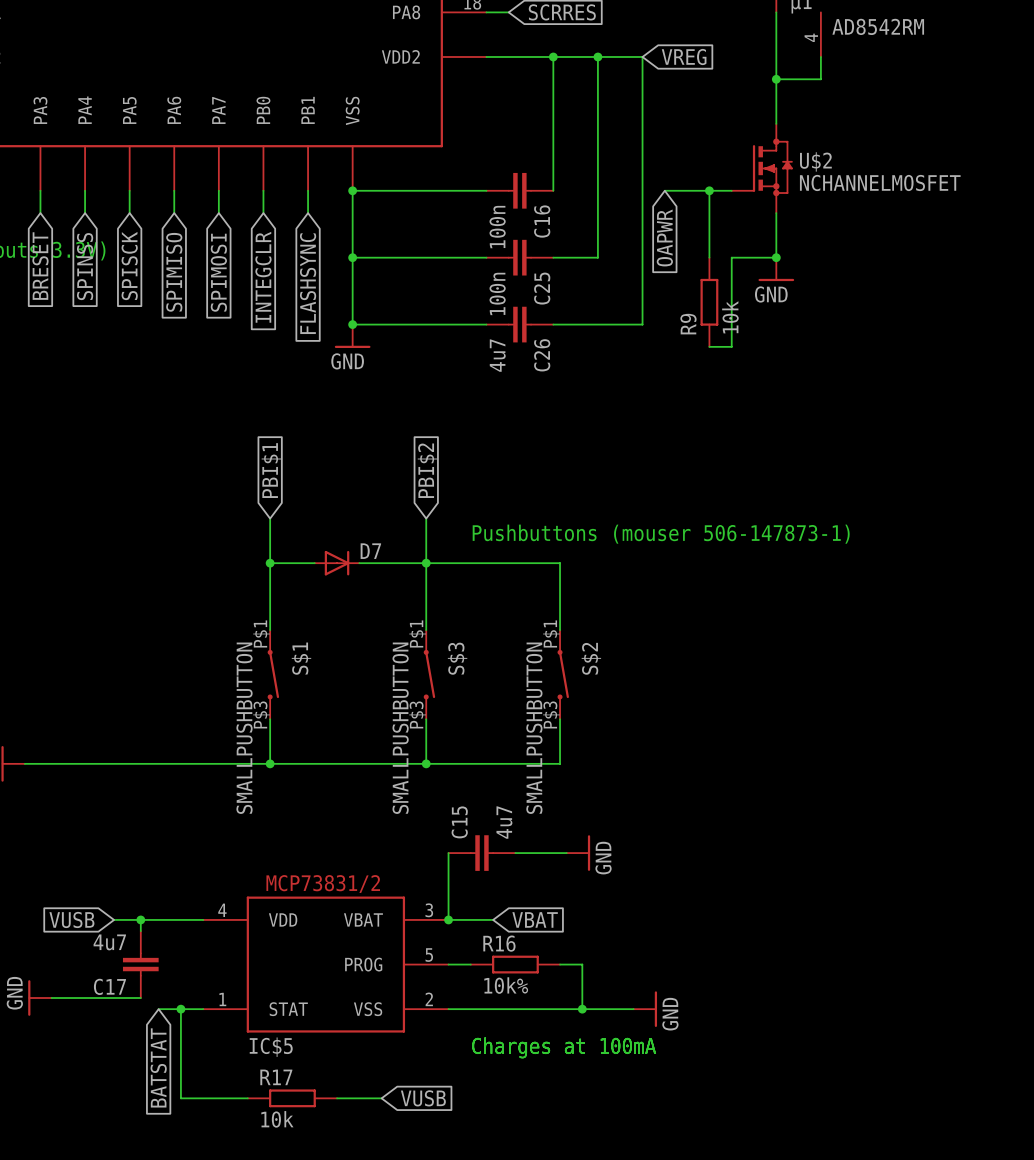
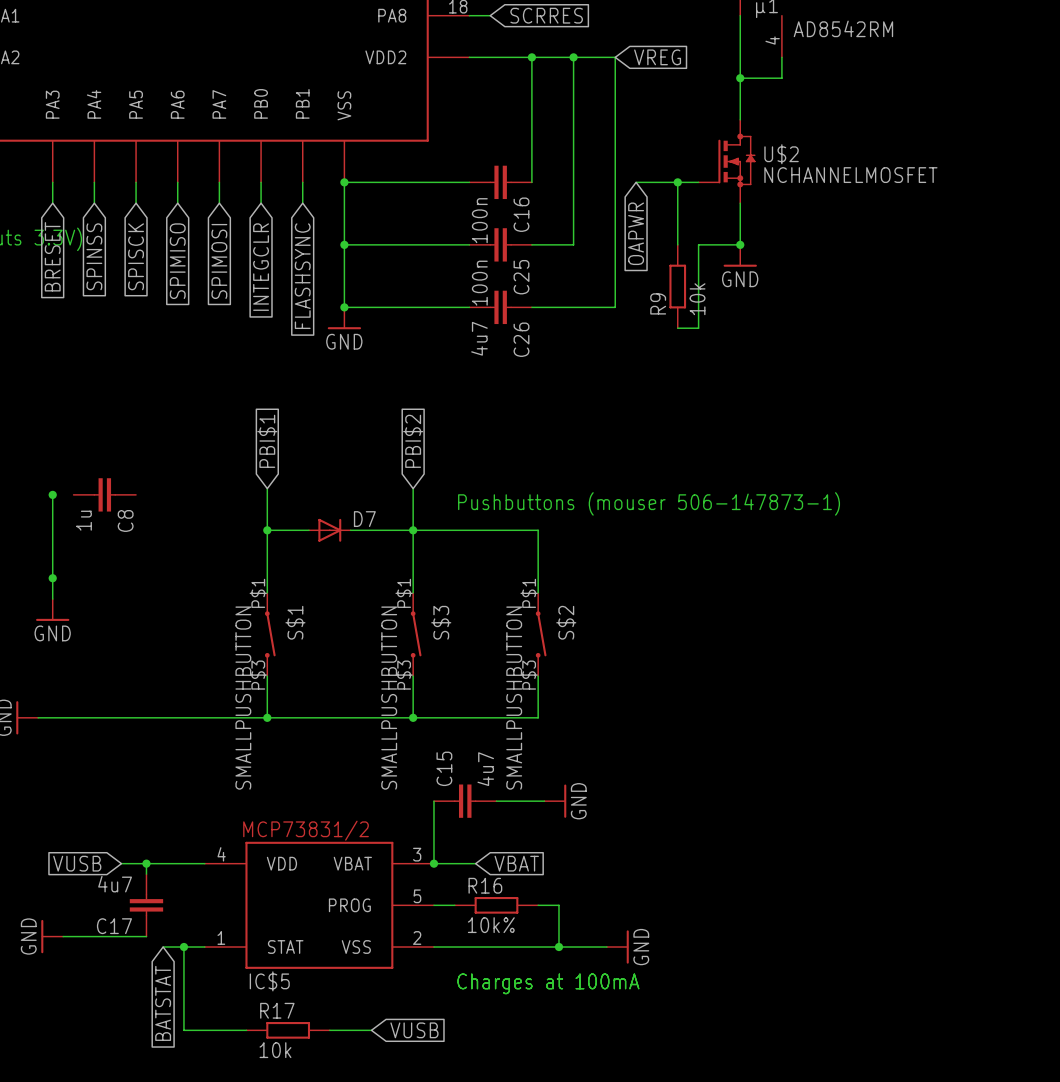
wire: none -> (52, 494) (52, 599)
junction: none -> (52, 494)
C8: none -> 1u (104, 494)
junction: none -> (52, 578)
power symbol: none -> GND (52, 610)

